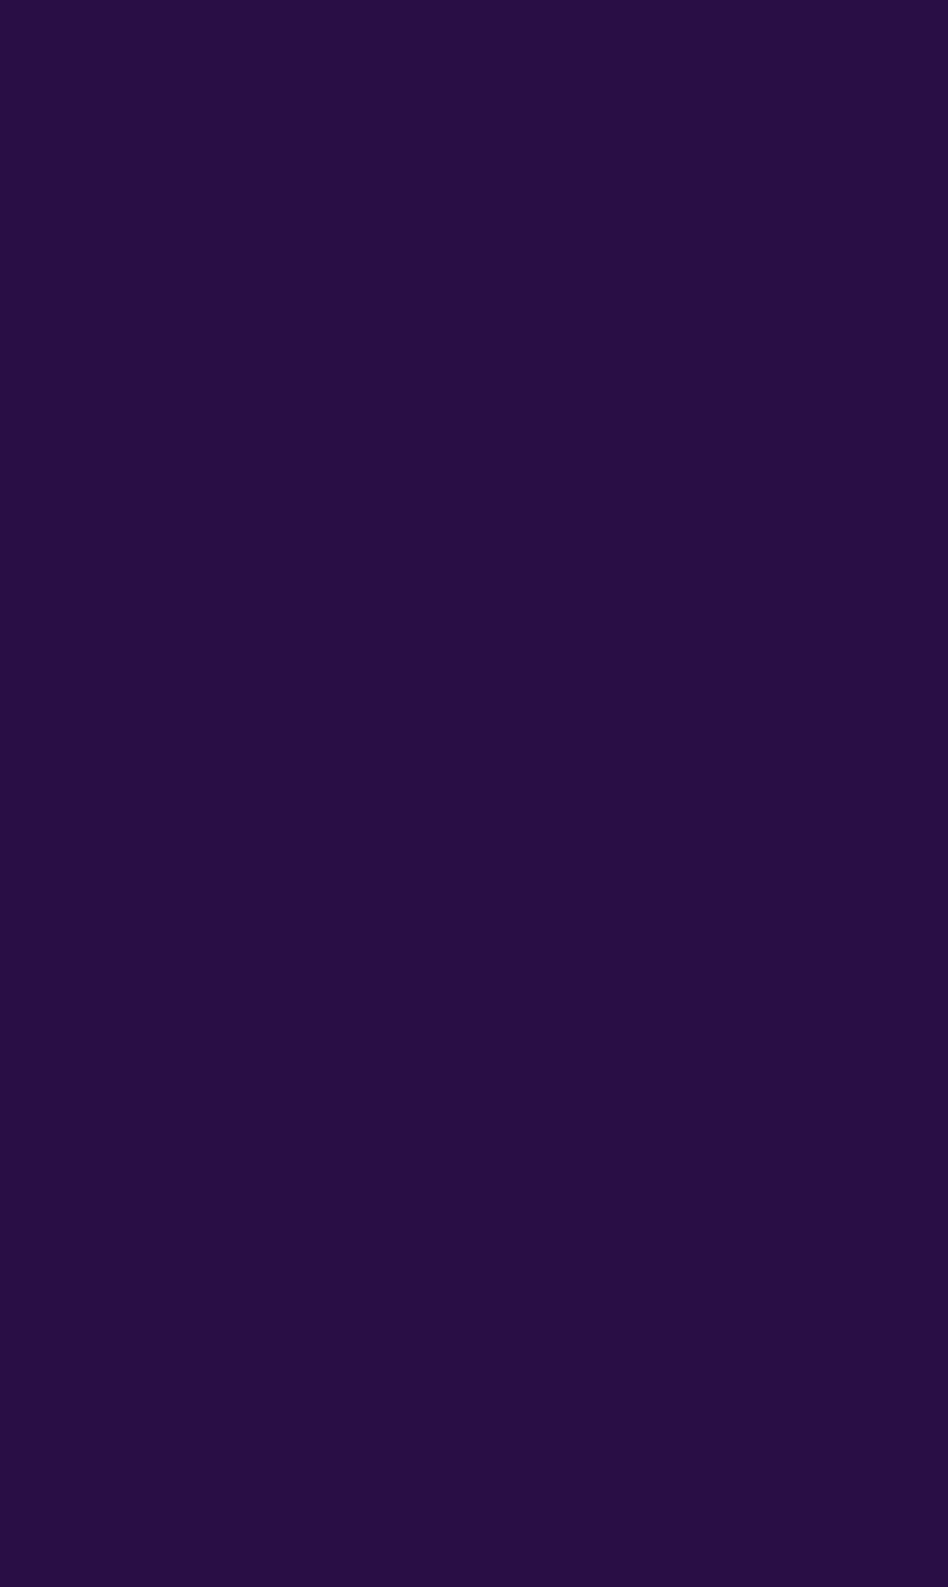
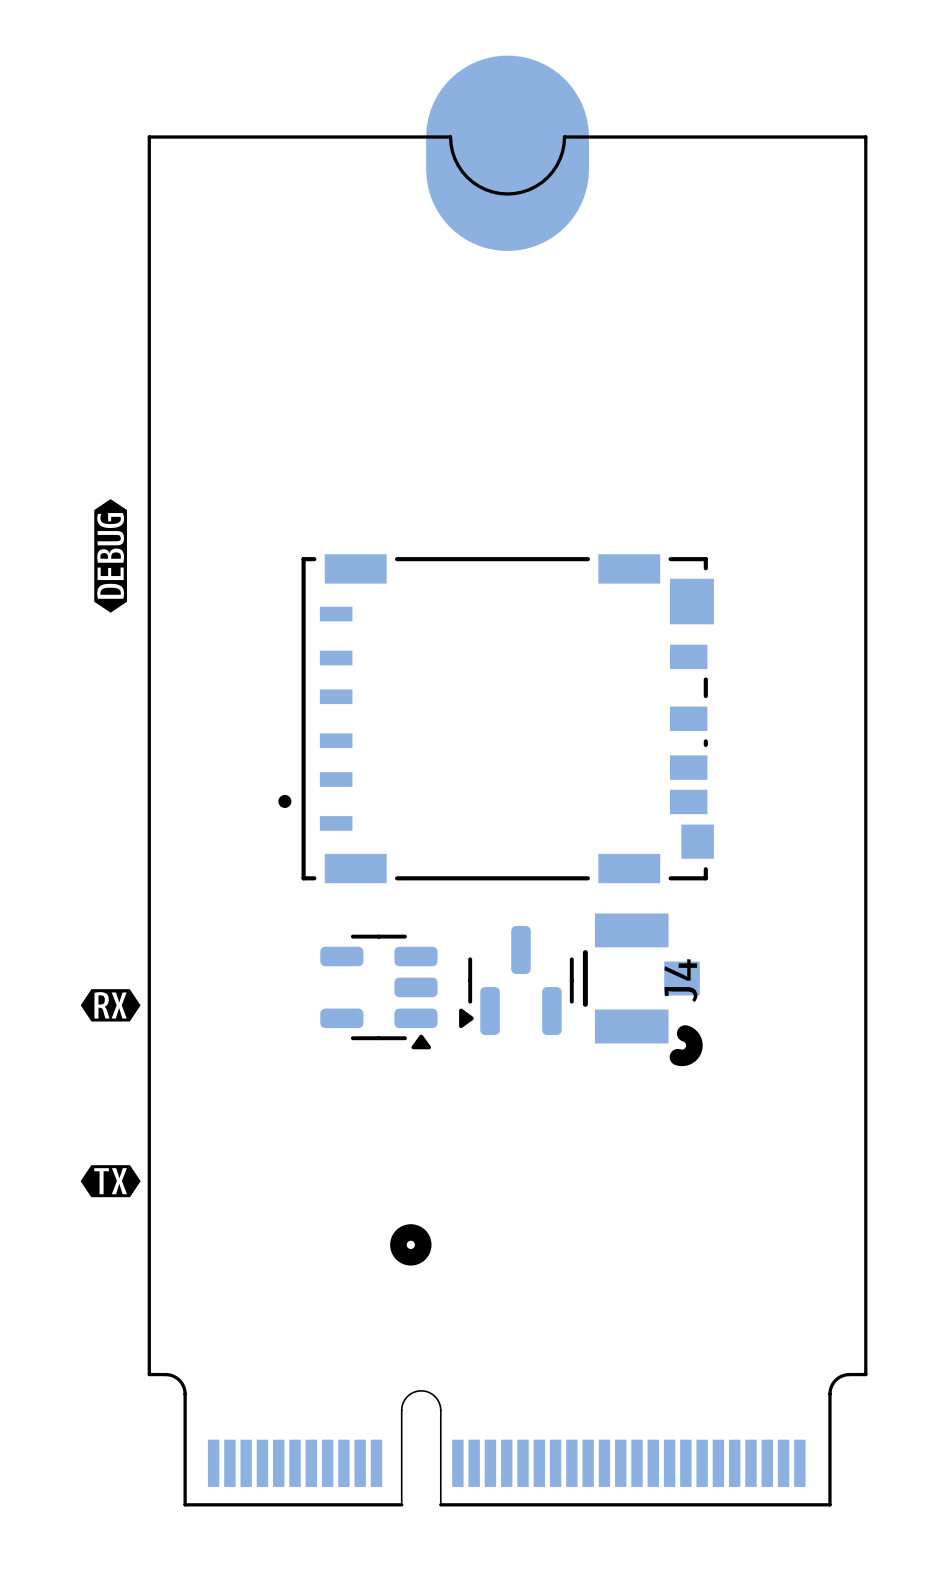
drawing: none -> [94, 499, 127, 613]
part: none -> (496, 718)
part: none -> (507, 781)
part: none -> (516, 980)
drawing: none -> [80, 989, 141, 1022]
J4: none -> (642, 989)
part: none -> (378, 991)
drawing: none -> [80, 1165, 141, 1198]
part: none -> (410, 1244)

